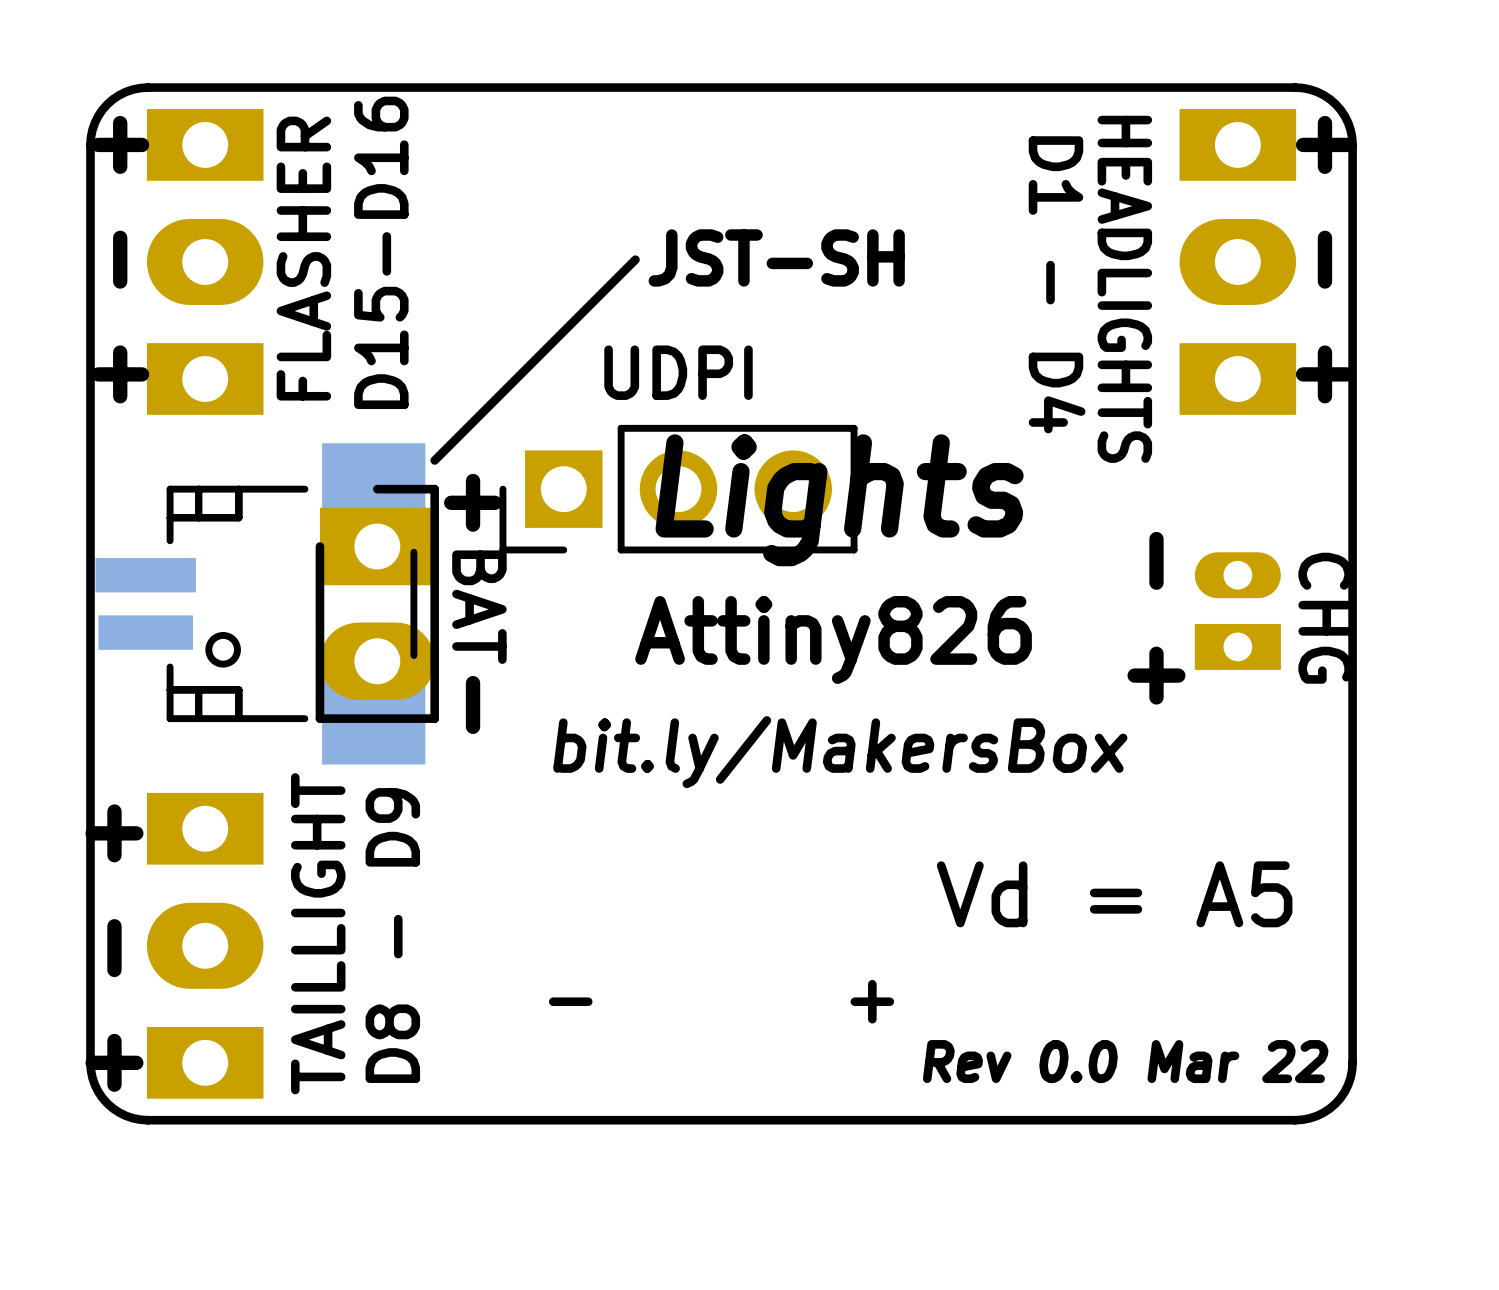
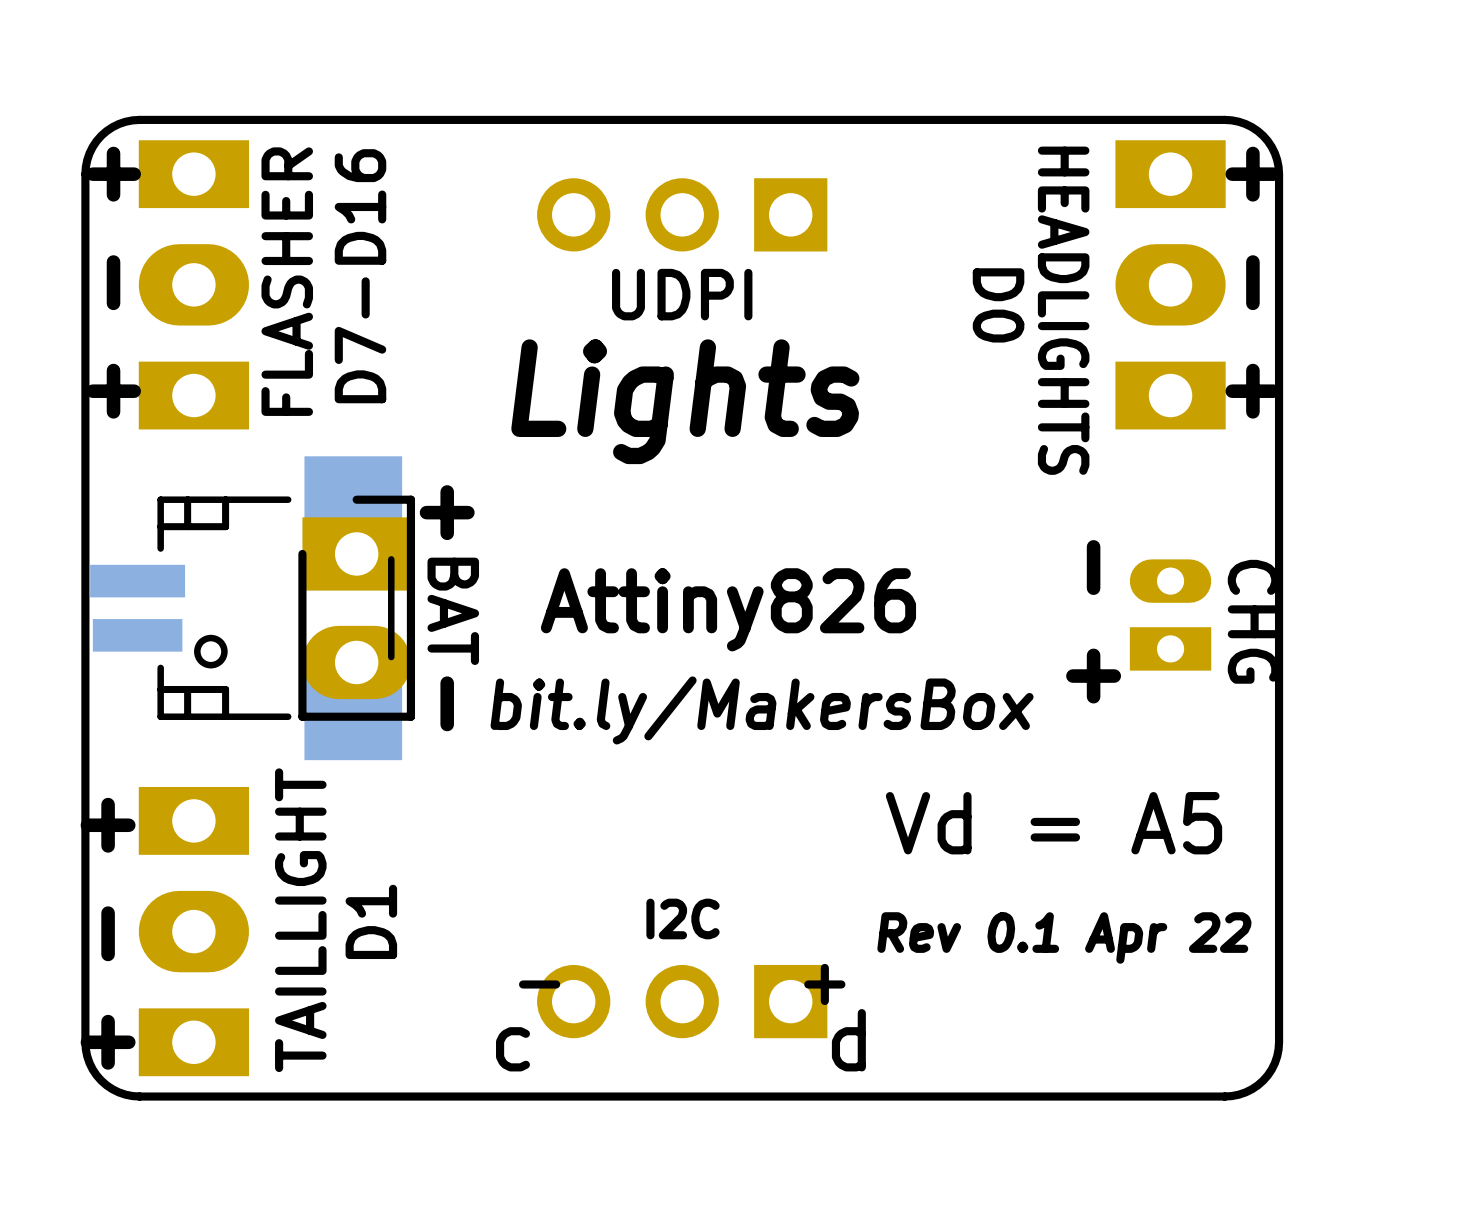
part: none -> UDPI (682, 214)
text: D15-D16 (381, 252) -> D7-D16 (360, 276)
text: JST-SH (776, 257) -> none
line: (635, 259) (434, 460) -> none
text: D1 - D4 (1057, 284) -> D0 (998, 305)
part: UDPI (678, 489) -> none
text position: Lights (839, 500) -> Lights (685, 401)
text position: Attiny826 (833, 639) -> Attiny826 (728, 609)
text position: bit.ly/MakersBox (840, 752) -> bit.ly/MakersBox (762, 710)
text position: Vd = A5 (1114, 894) -> Vd = A5 (1054, 823)
text: D8 - D9 (392, 935) -> D1 (371, 921)
text: none -> Rev 0.1 Apr 22 (1064, 937)
part: none -> I2C (682, 1001)
text: none -> c d (680, 1040)
text: Rev 0.0 Mar 22 (1125, 1061) -> none

